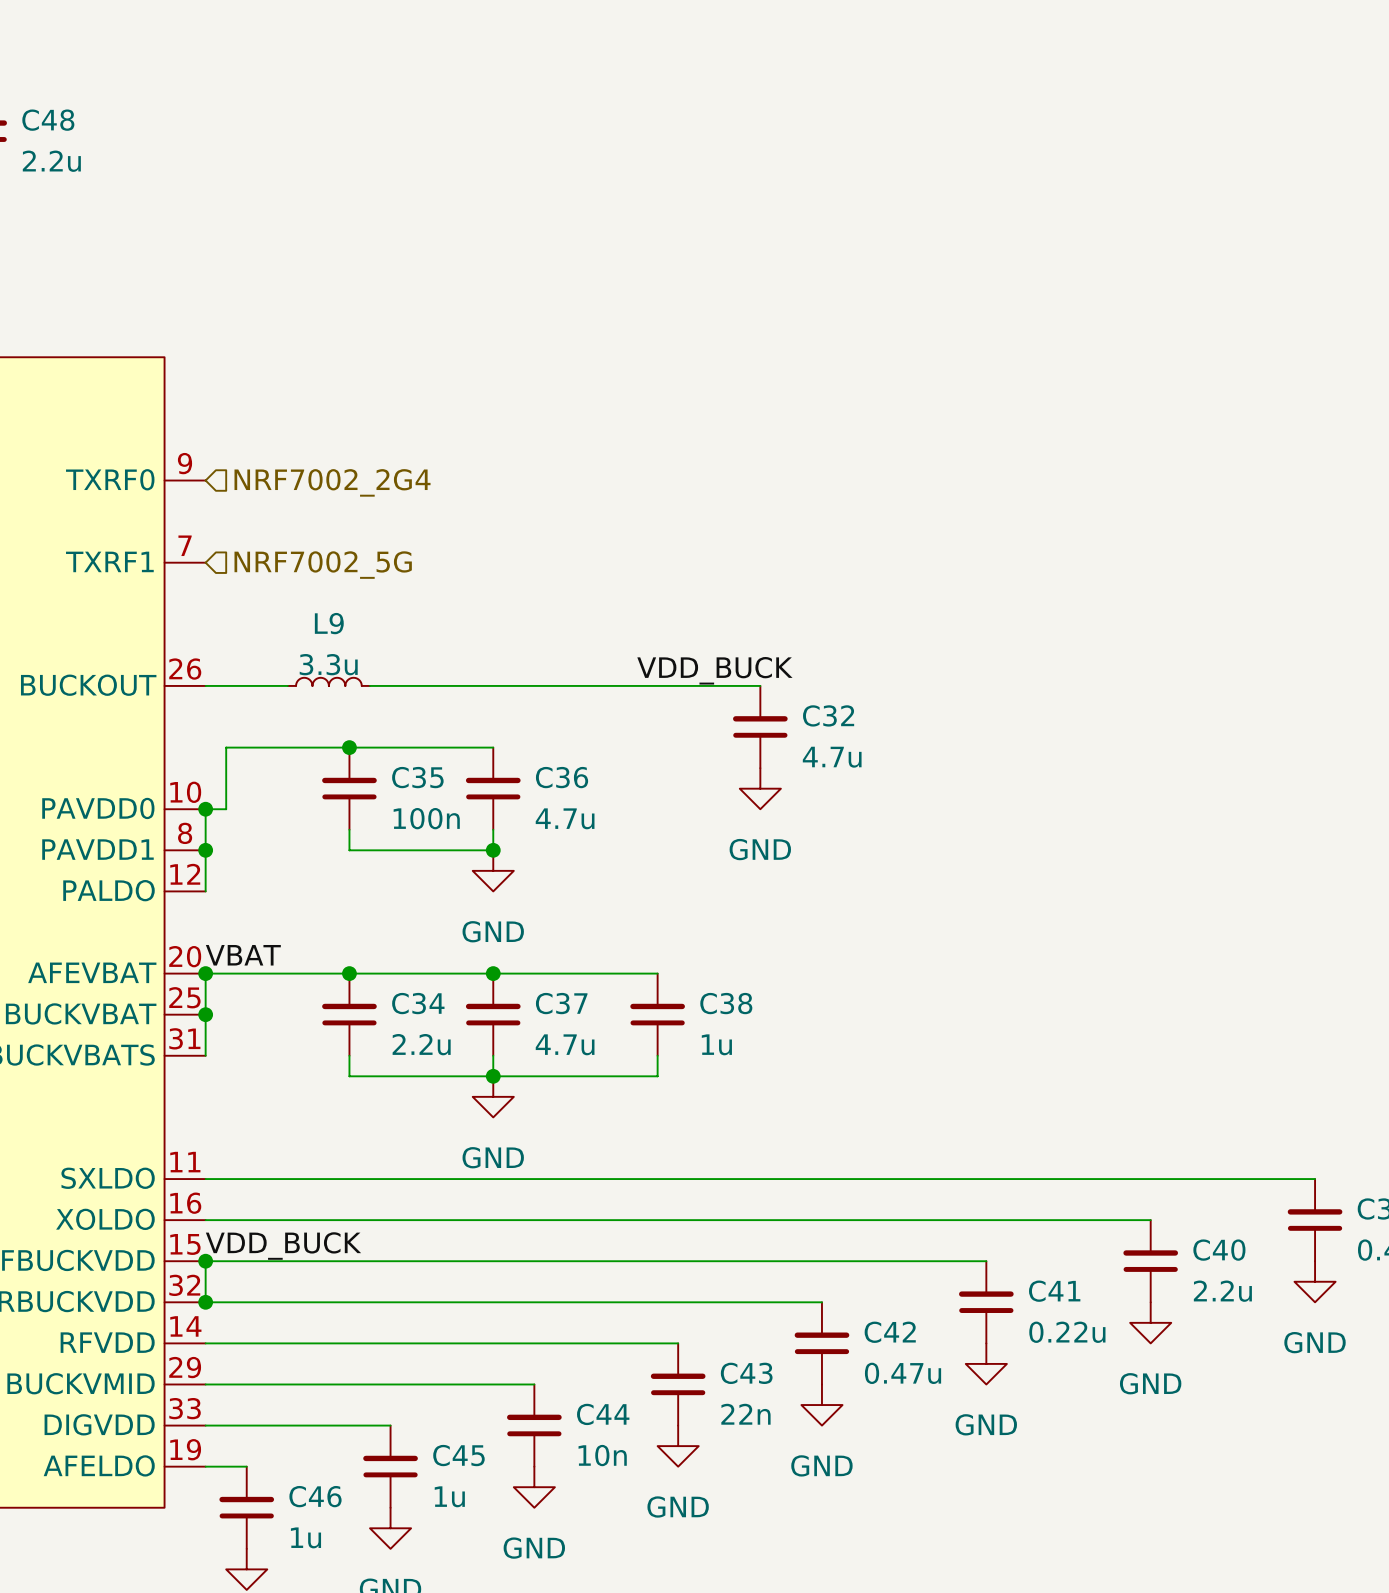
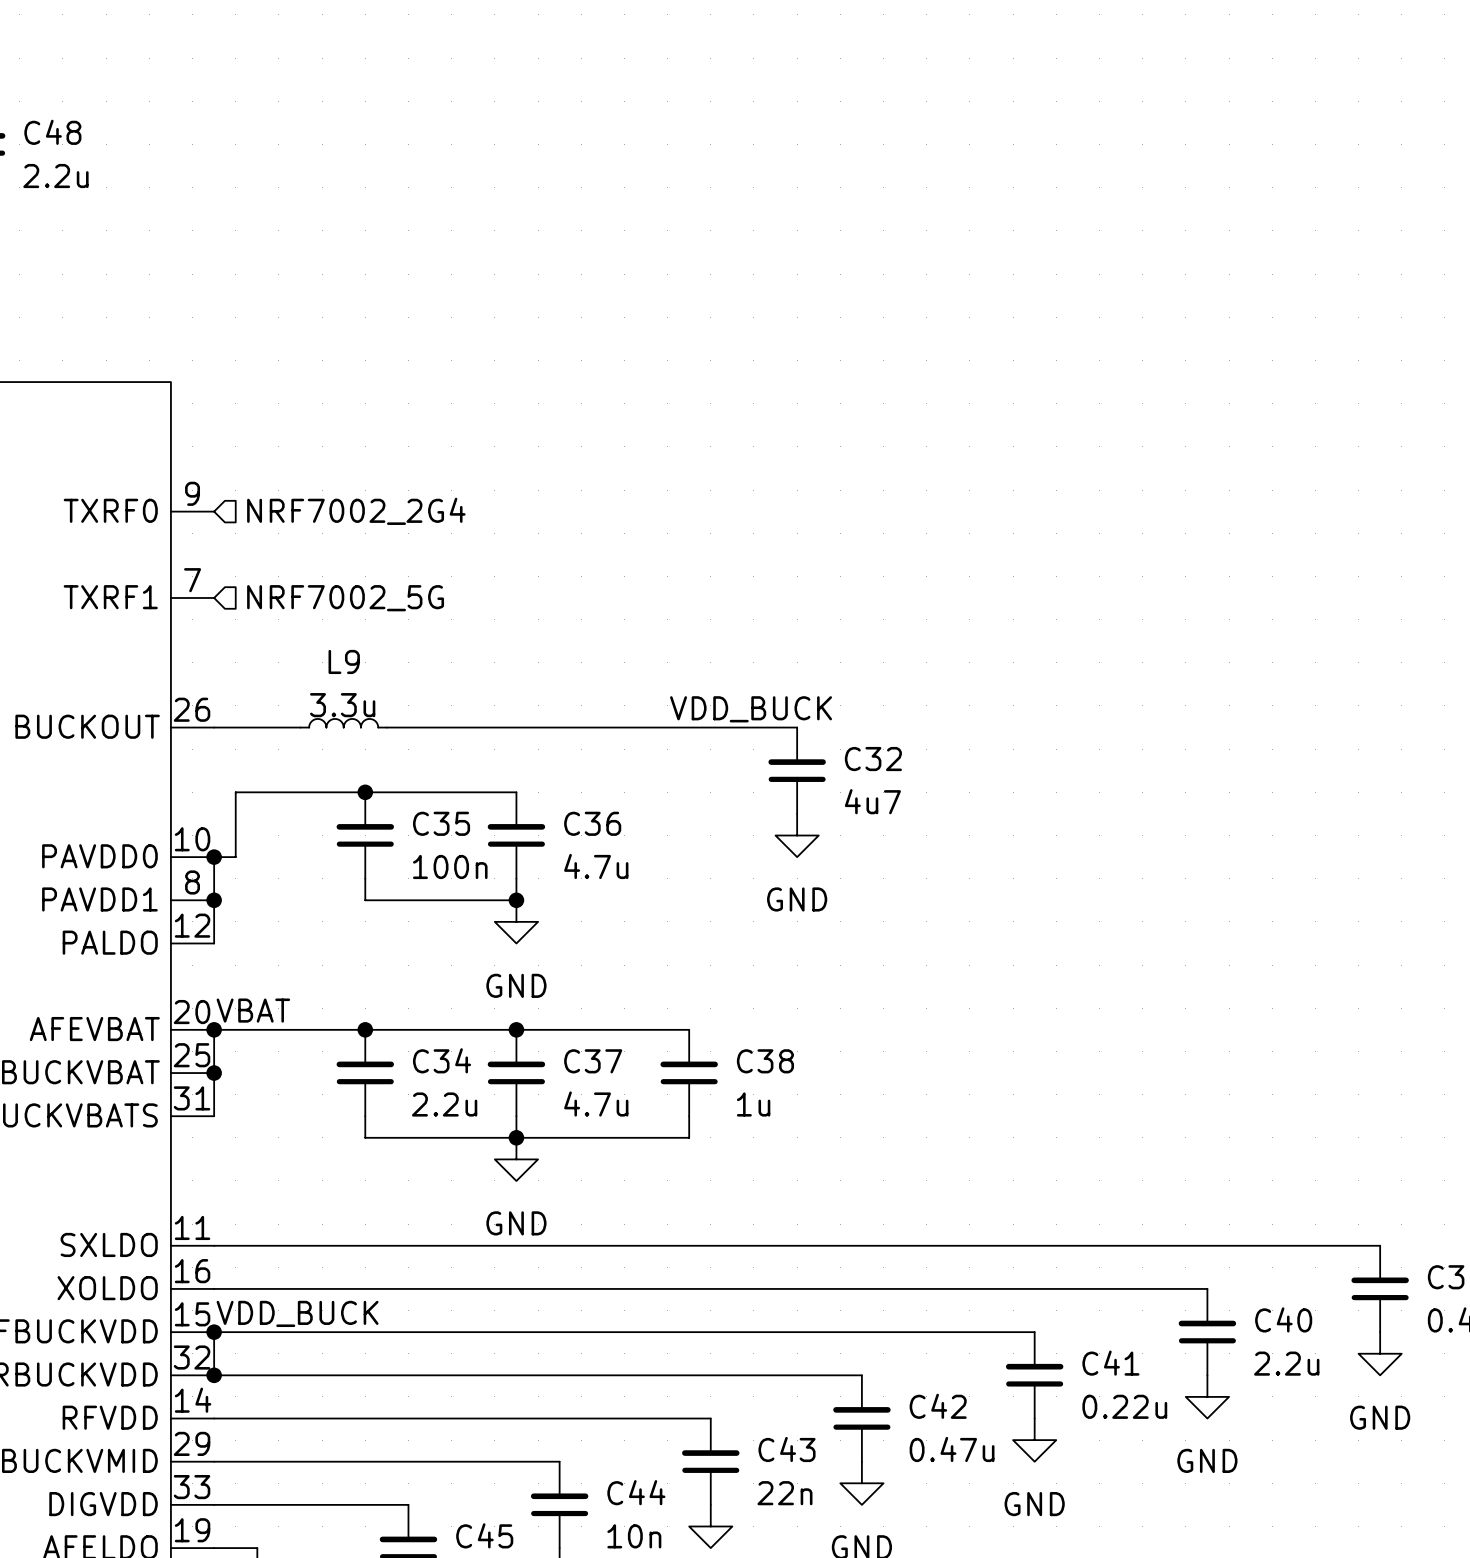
C32 value: 4.7u (832, 757) -> 4u7 (872, 801)

